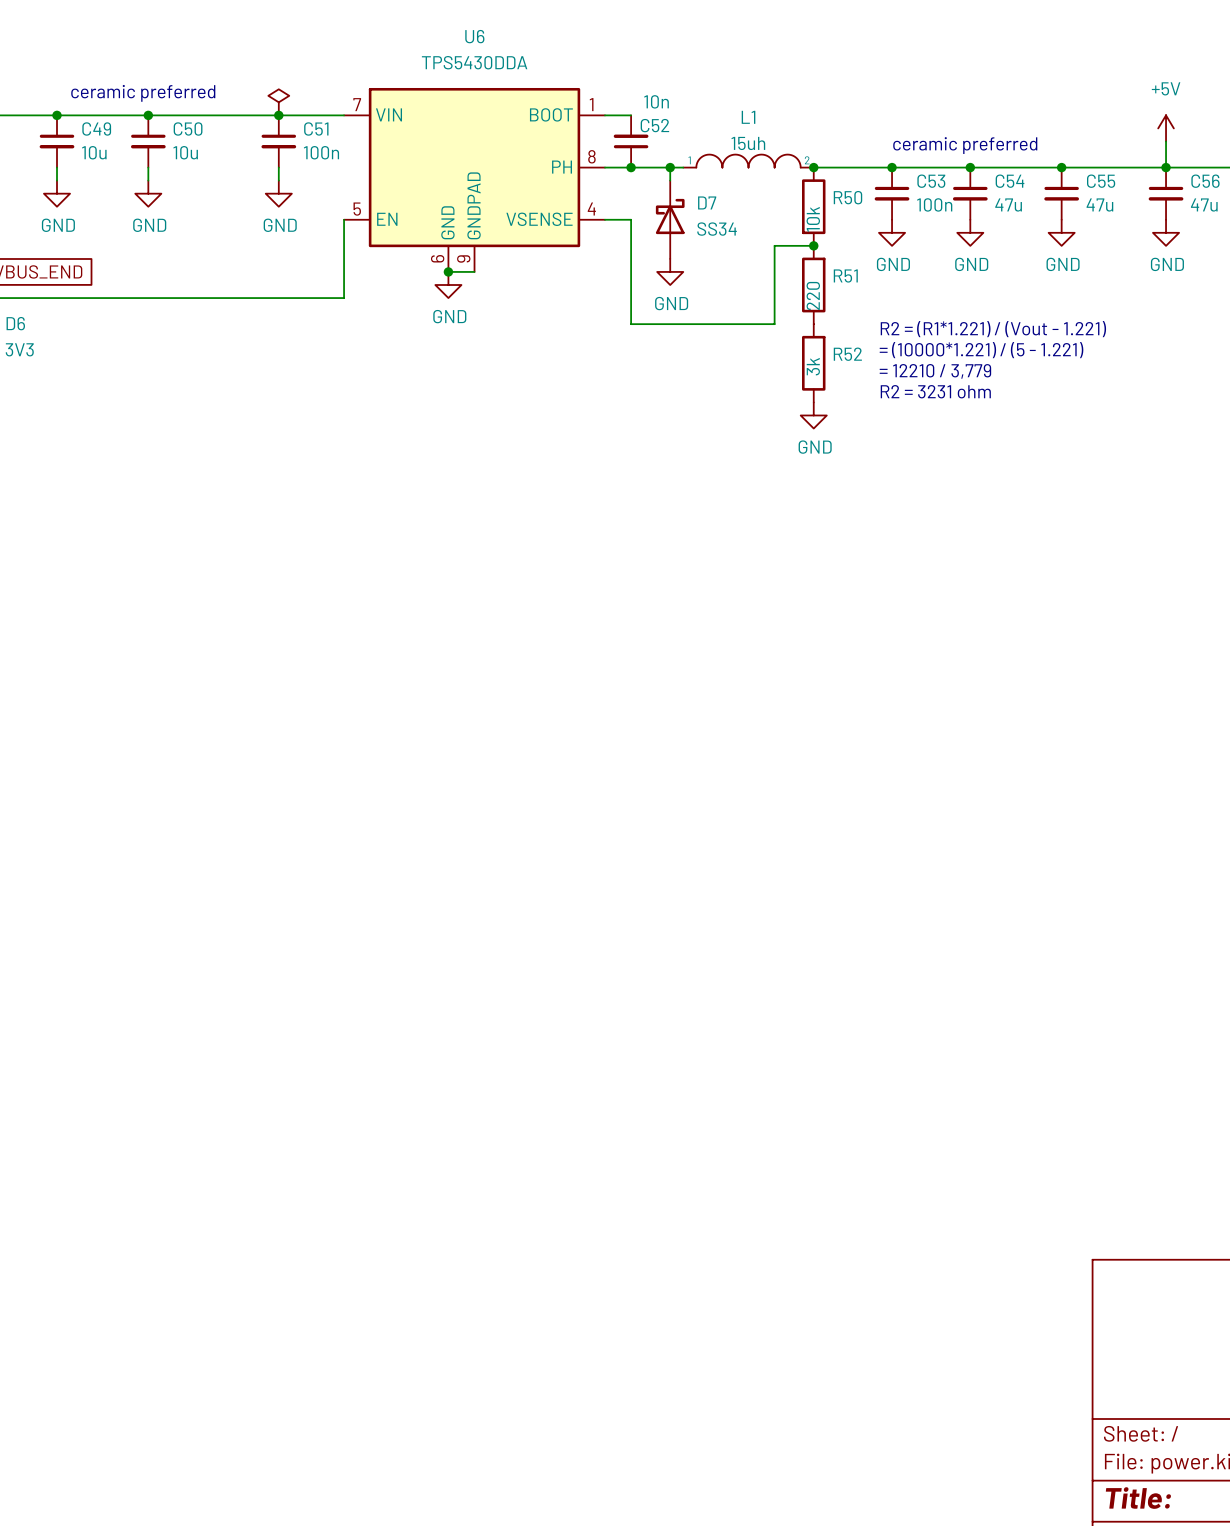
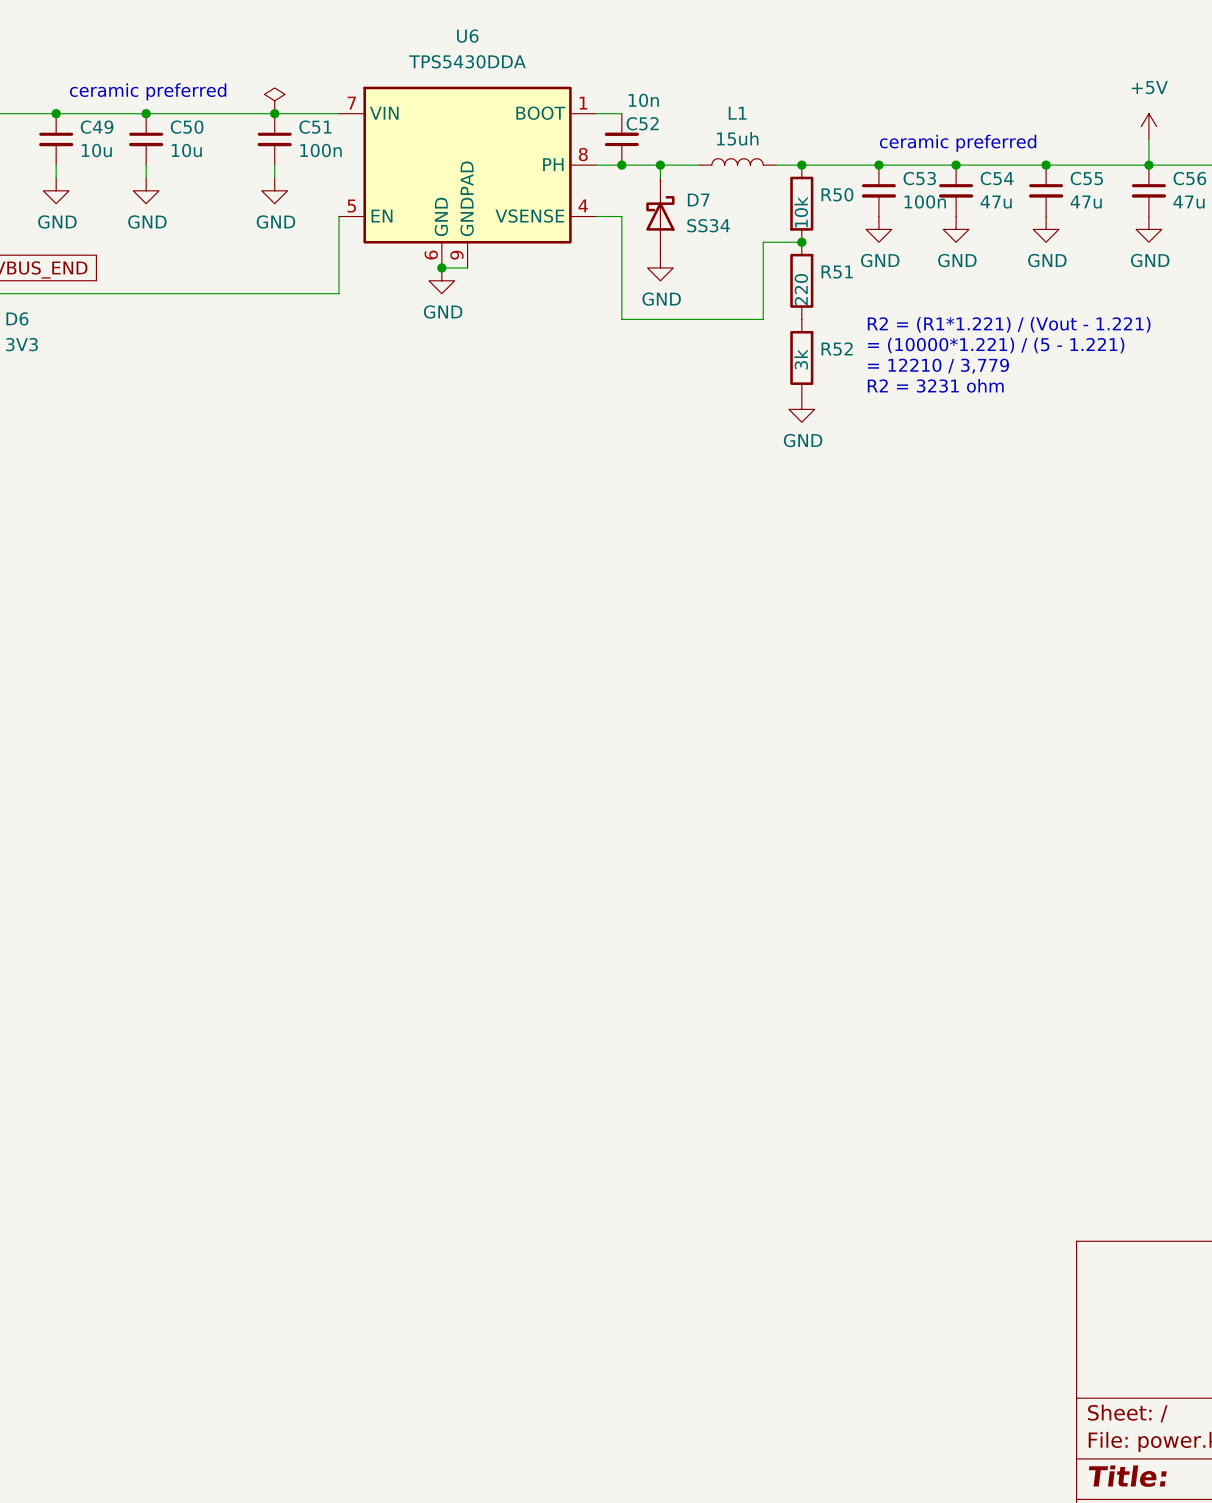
L1 symbol: [683, 154, 814, 168] -> [698, 158, 777, 166]
wire: none -> (673, 165) (698, 165)
wire: none -> (776, 165) (801, 165)

